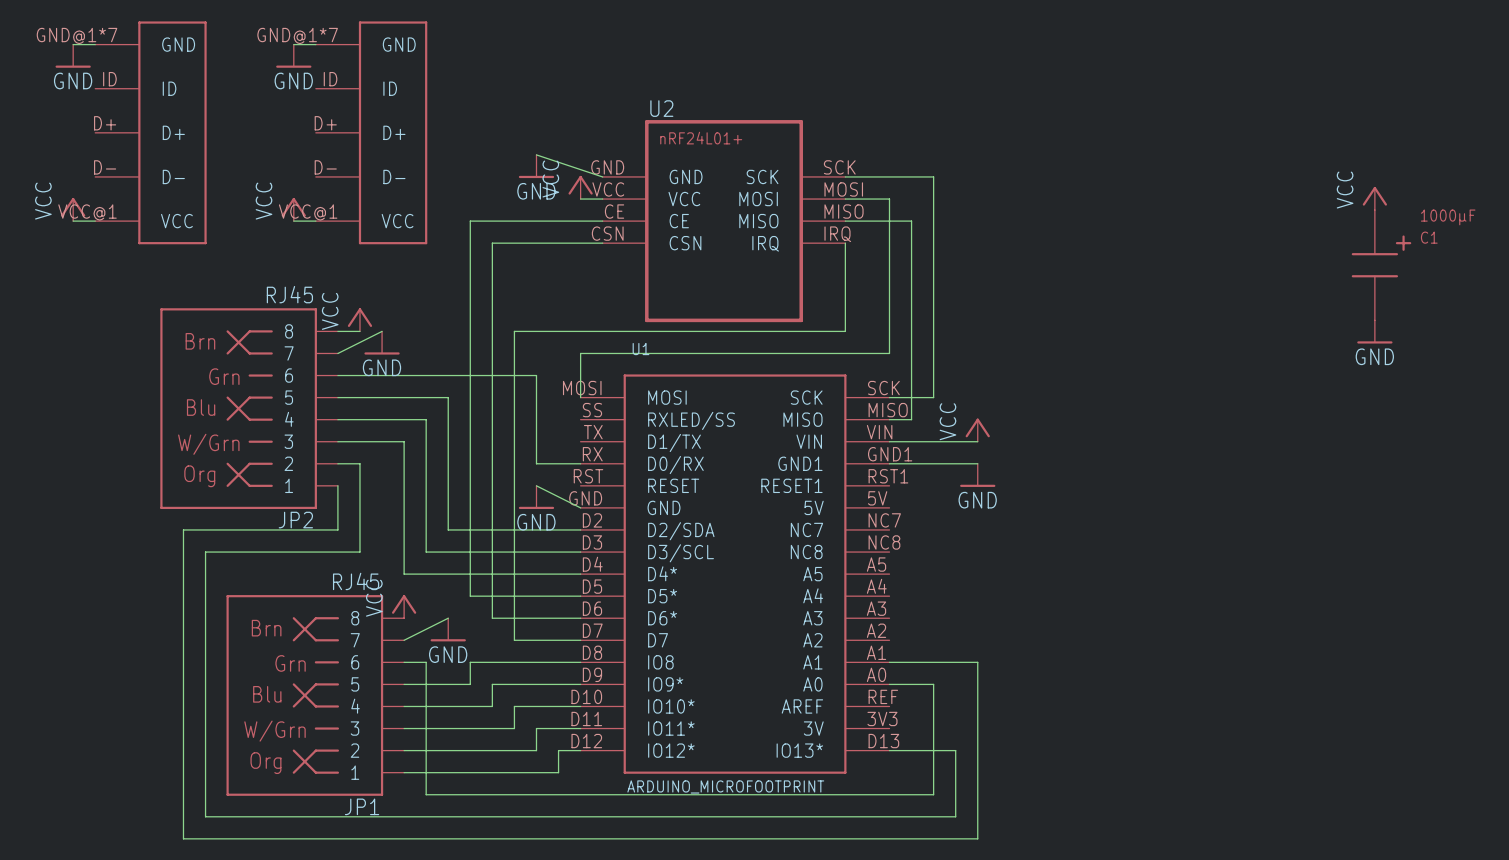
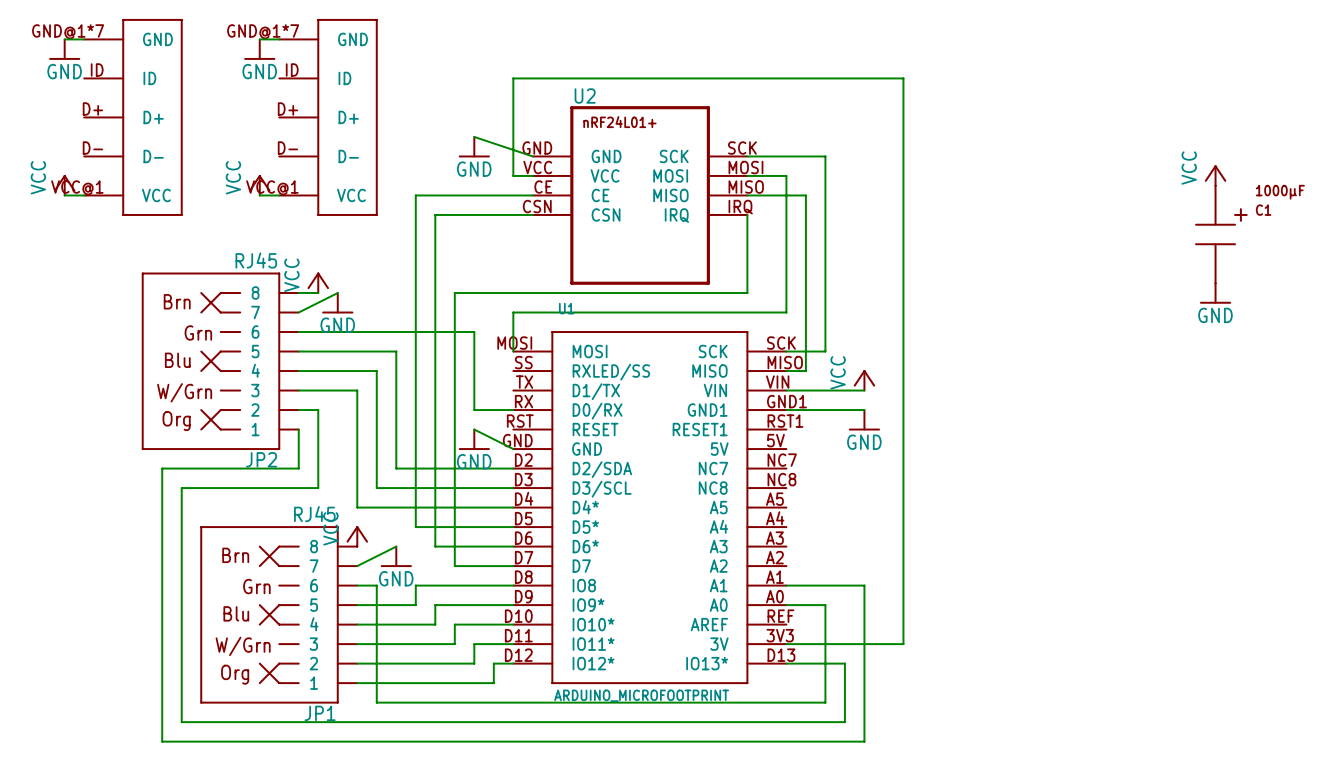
power symbol: VCC (580, 187) -> none
wire: none -> (513, 175) (513, 78) (903, 78) (903, 644) (786, 644)

